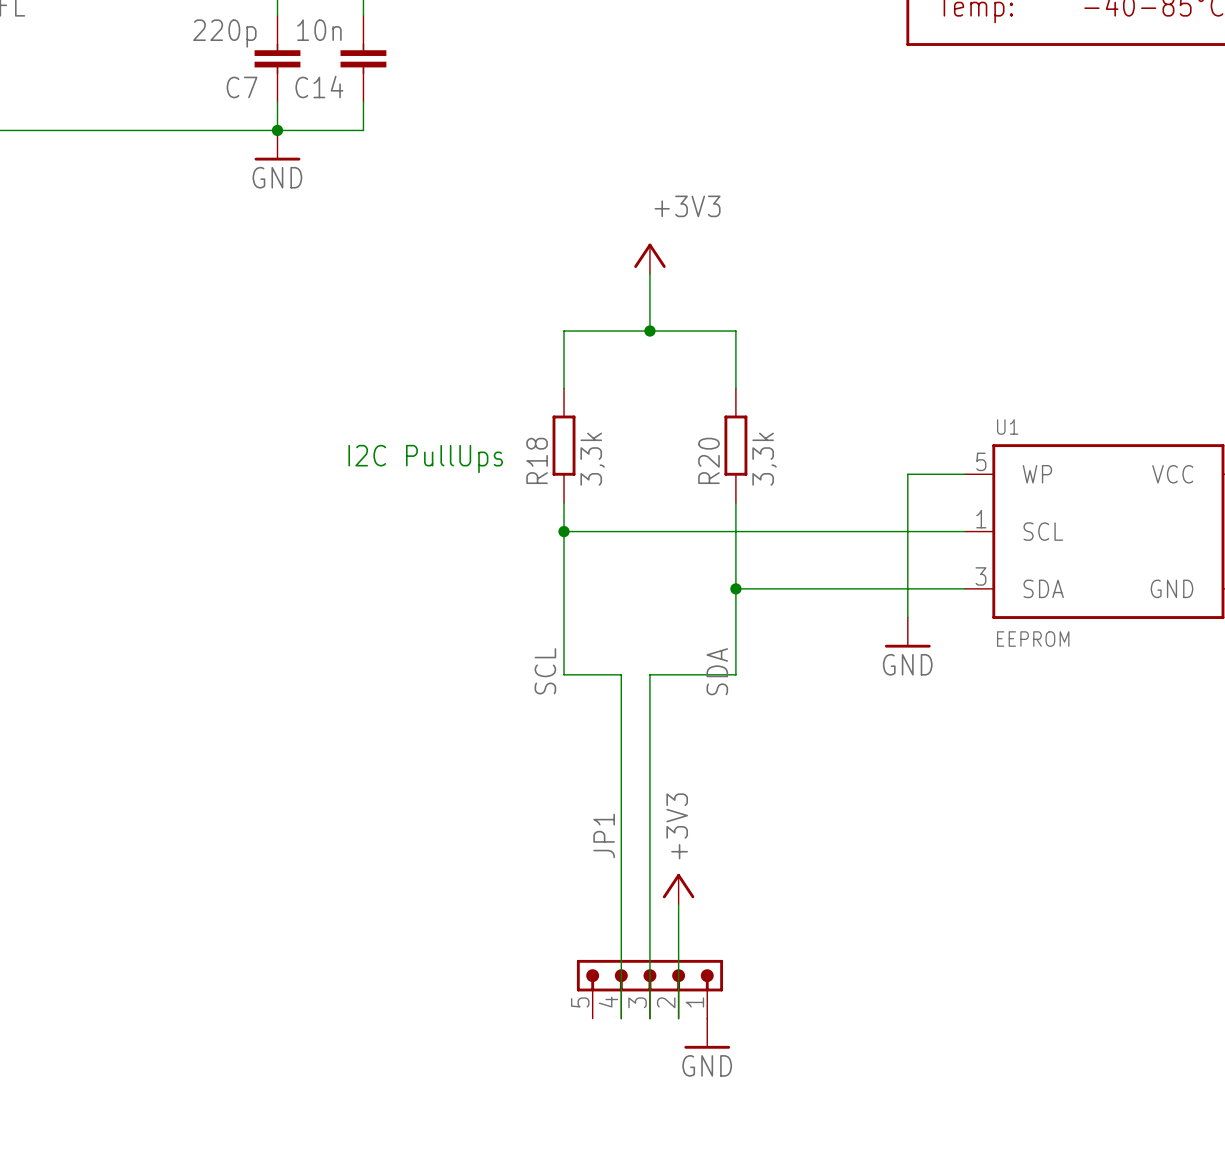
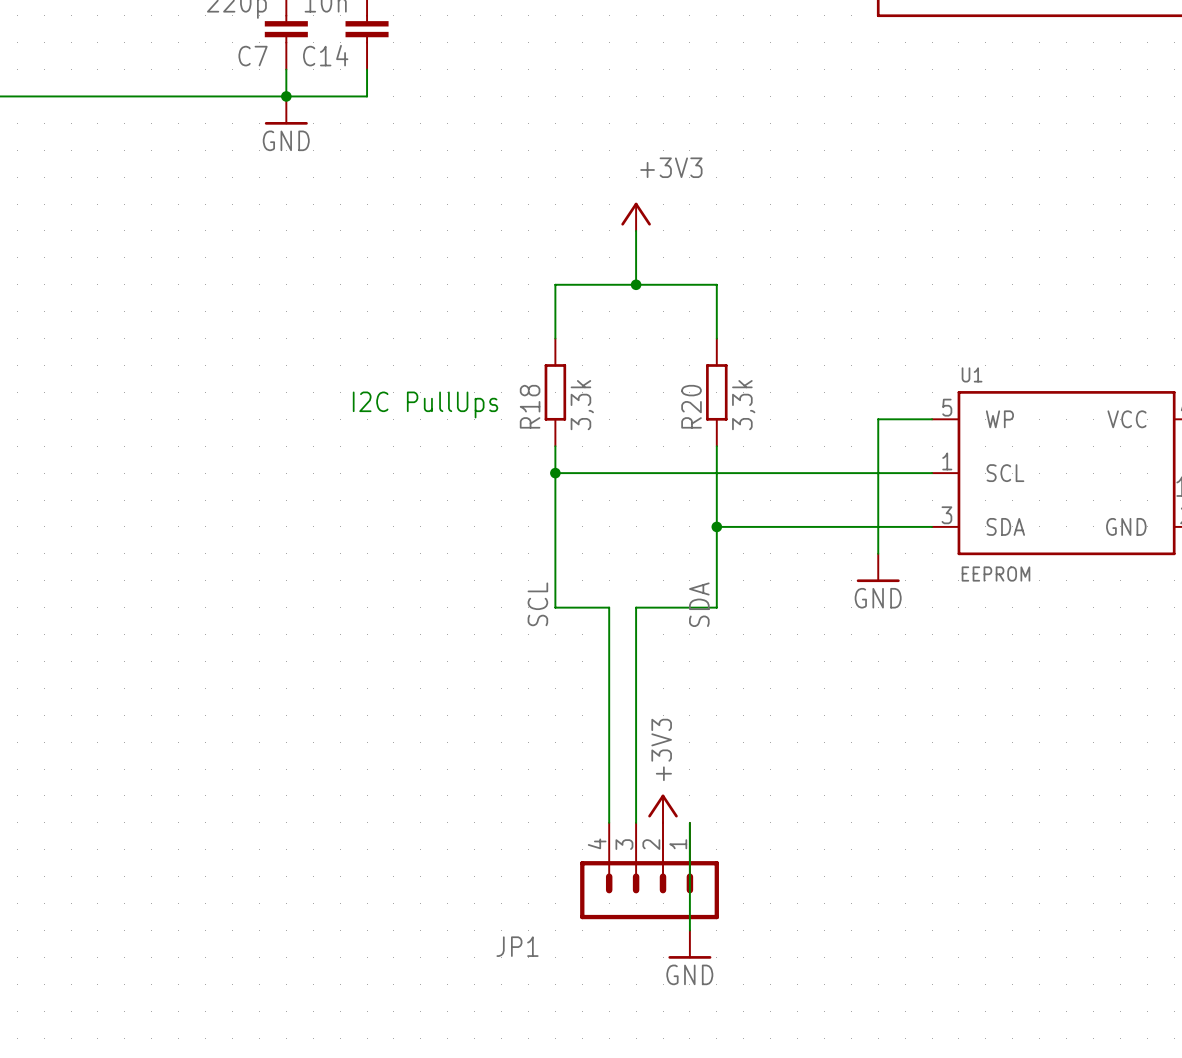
JP1 name position: JP1 (604, 835) -> JP1 (517, 946)
JP1 symbol: [576, 959, 724, 1019] -> [580, 822, 719, 920]

